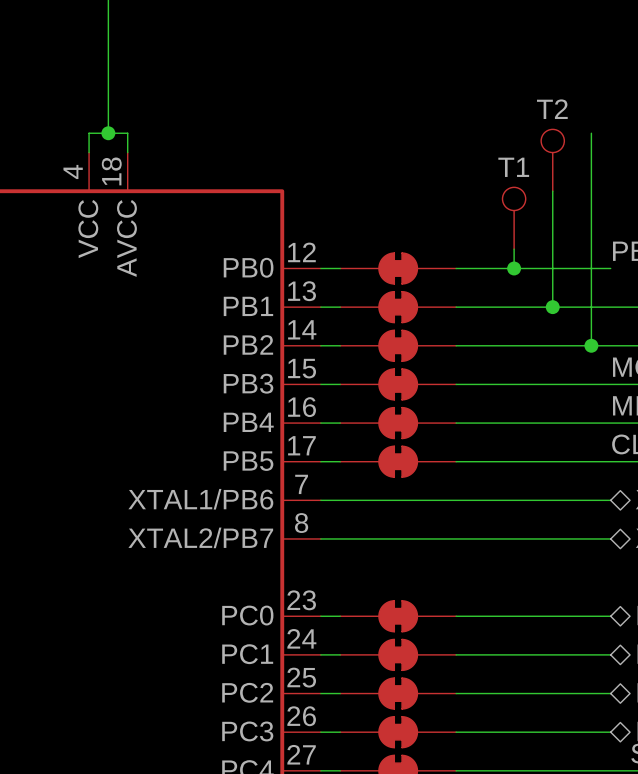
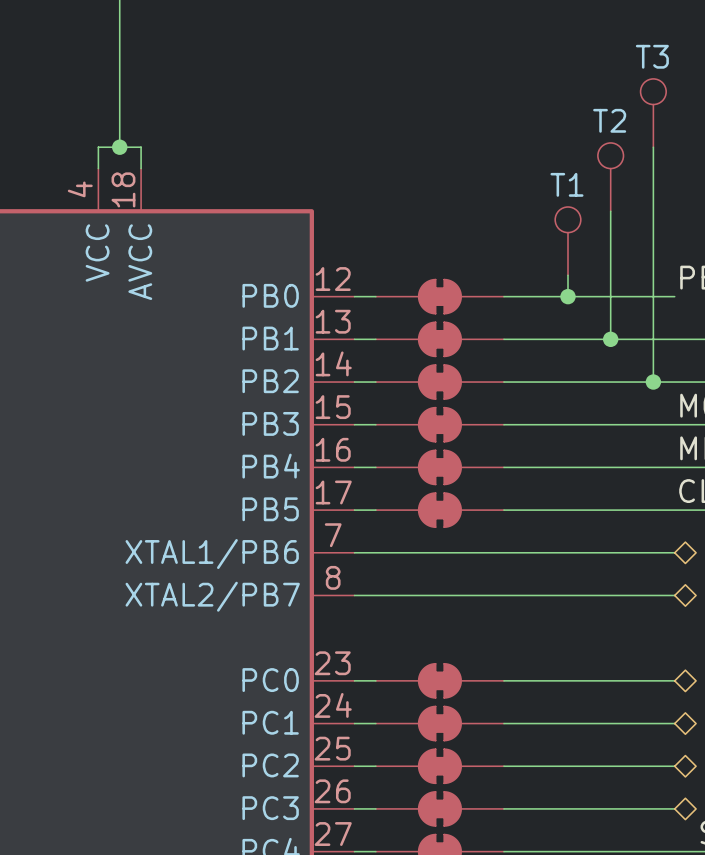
T3: none -> (653, 113)

